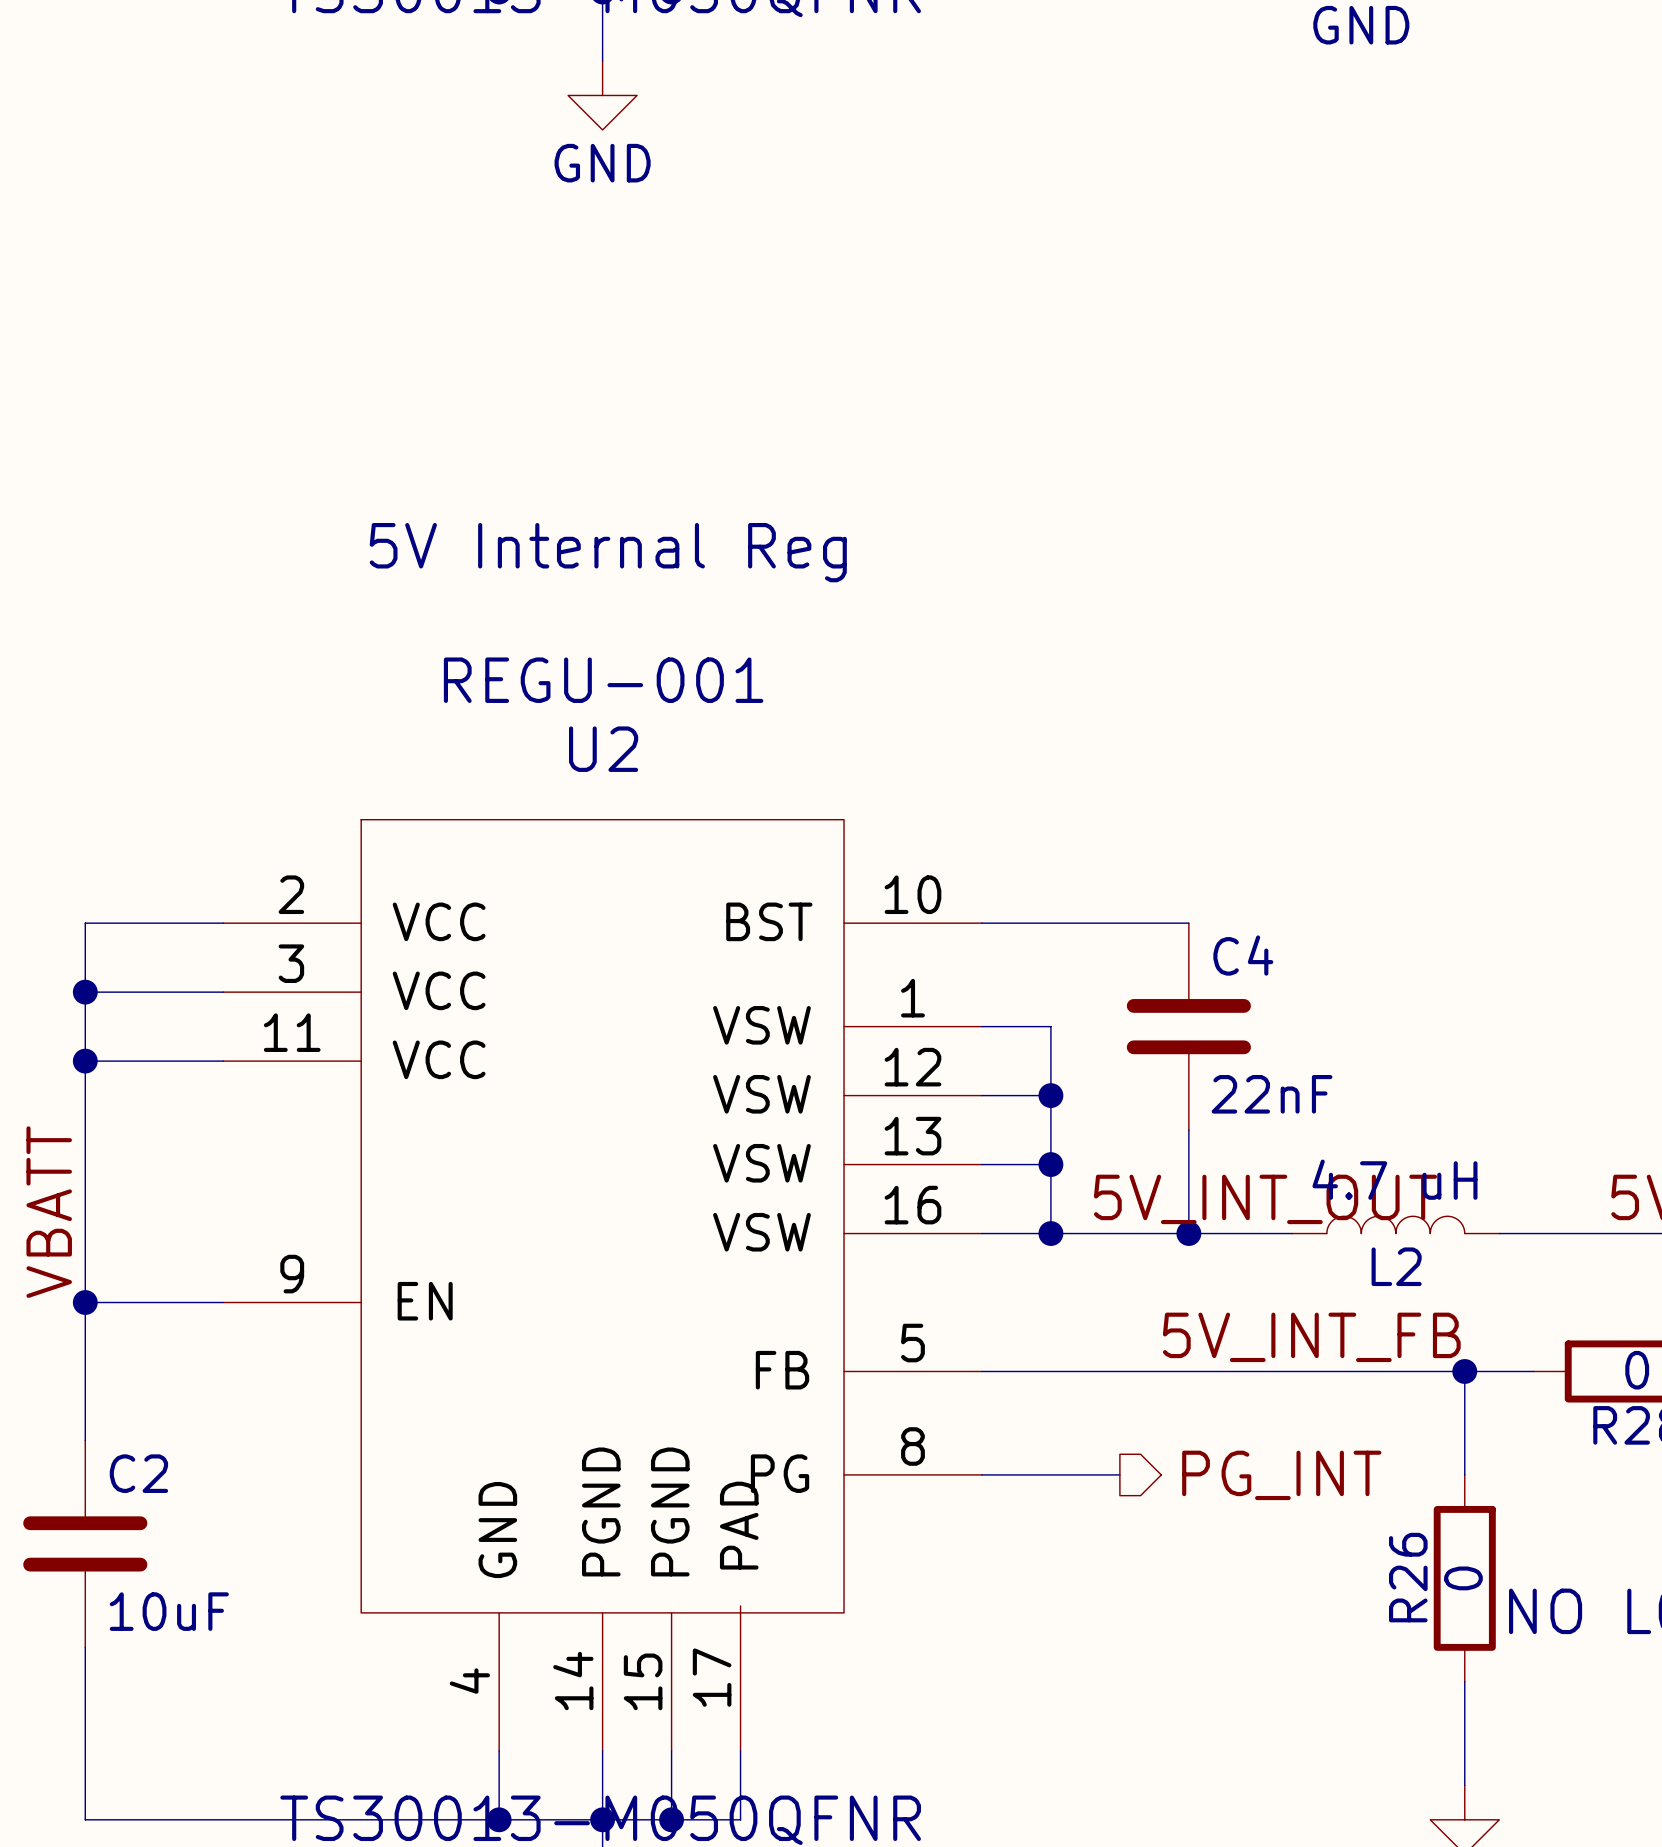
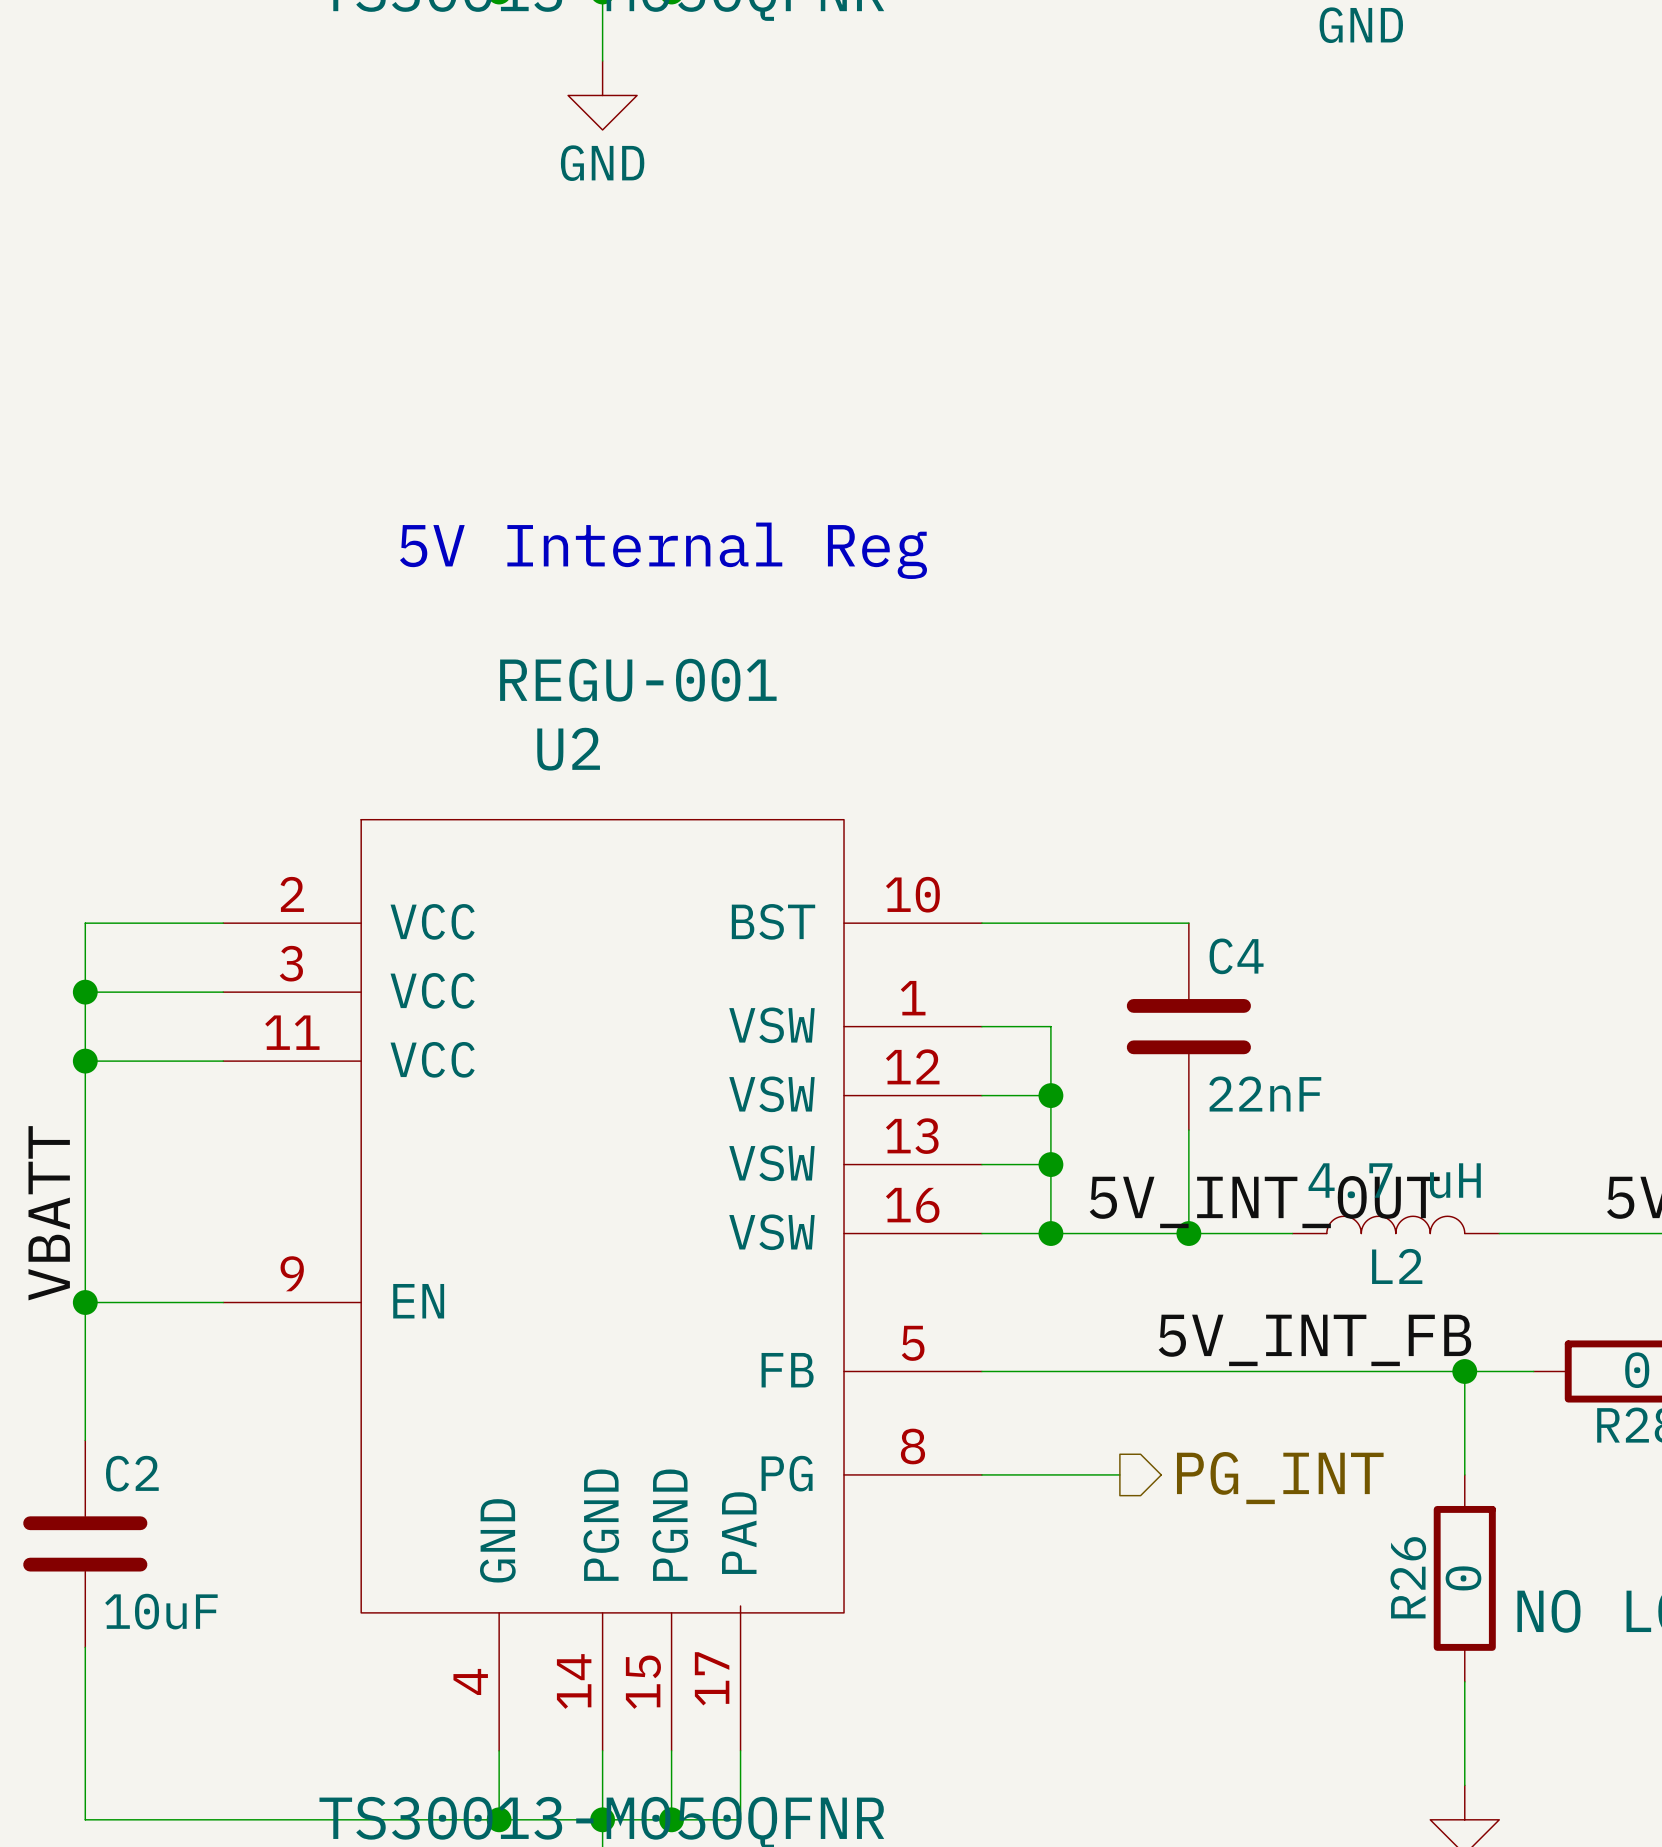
text position: 5V Internal Reg (608, 552) -> 5V Internal Reg (663, 550)
U2 text position: REGU-001 (603, 680) -> REGU-001 (638, 680)
U2 name position: U2 (603, 749) -> U2 (568, 749)

